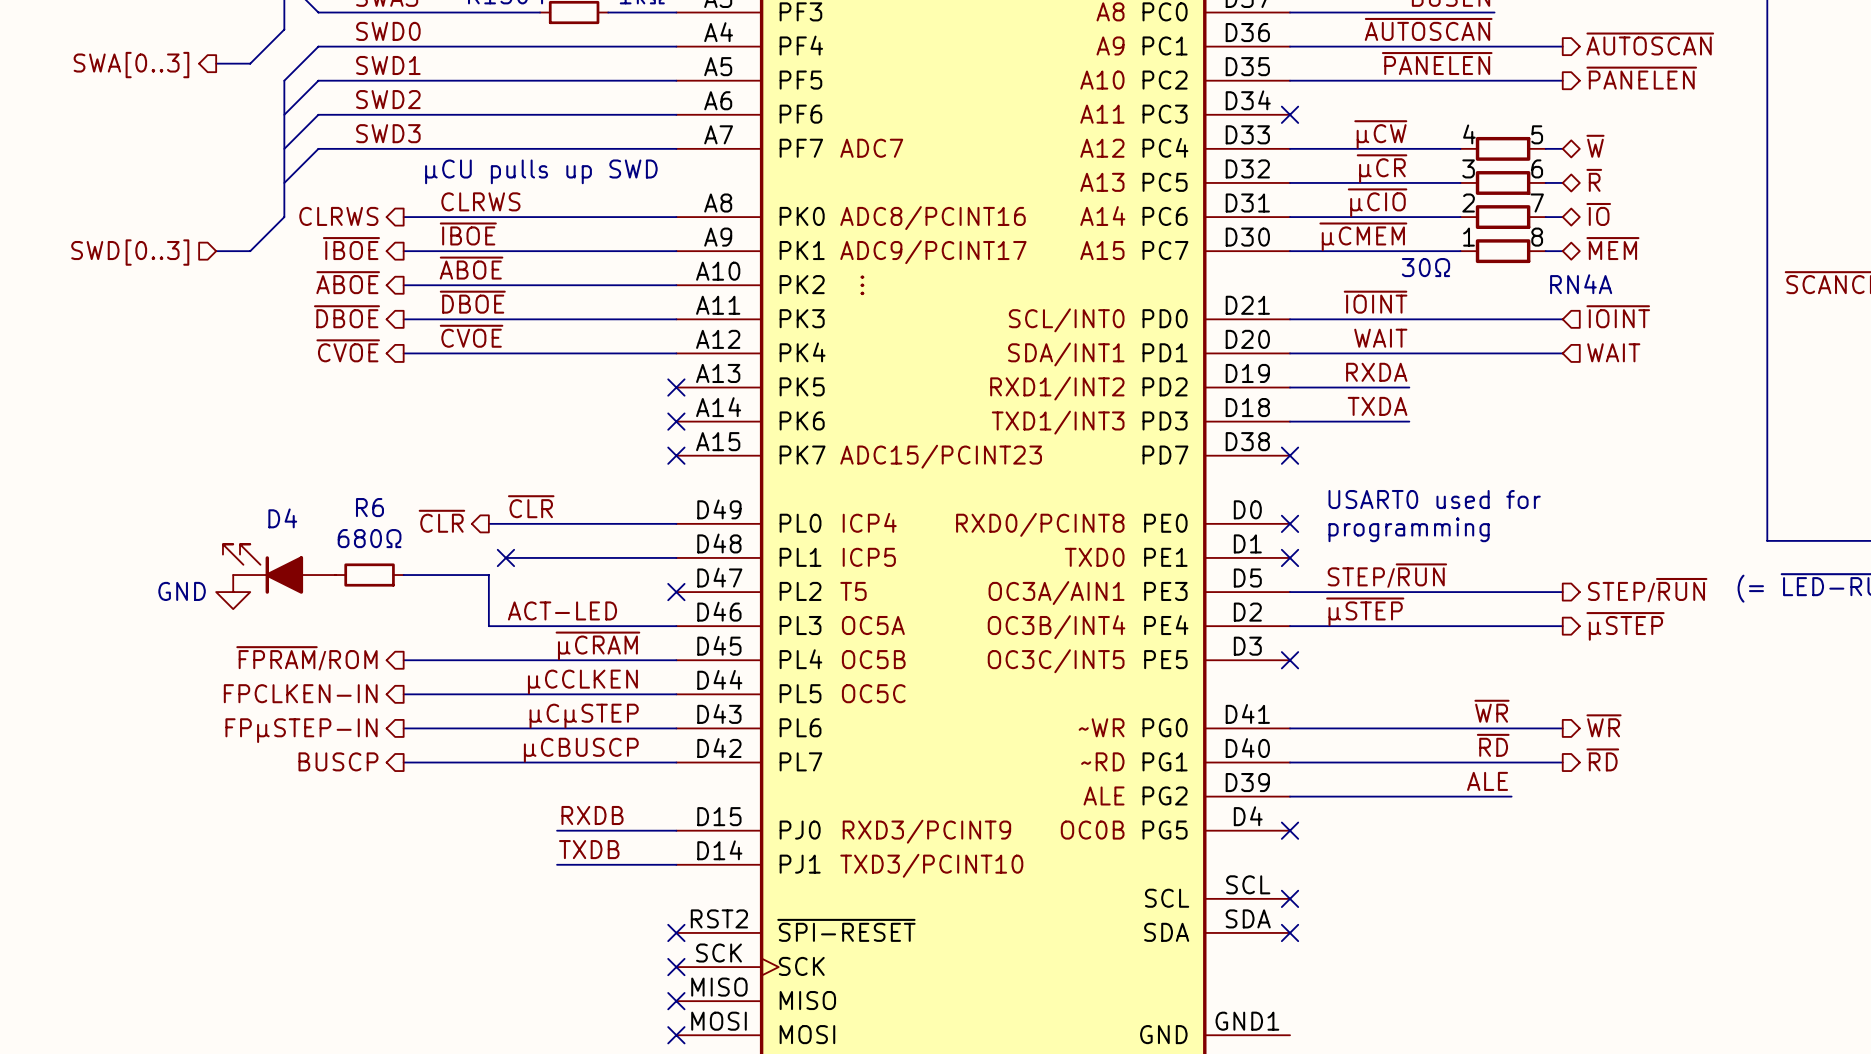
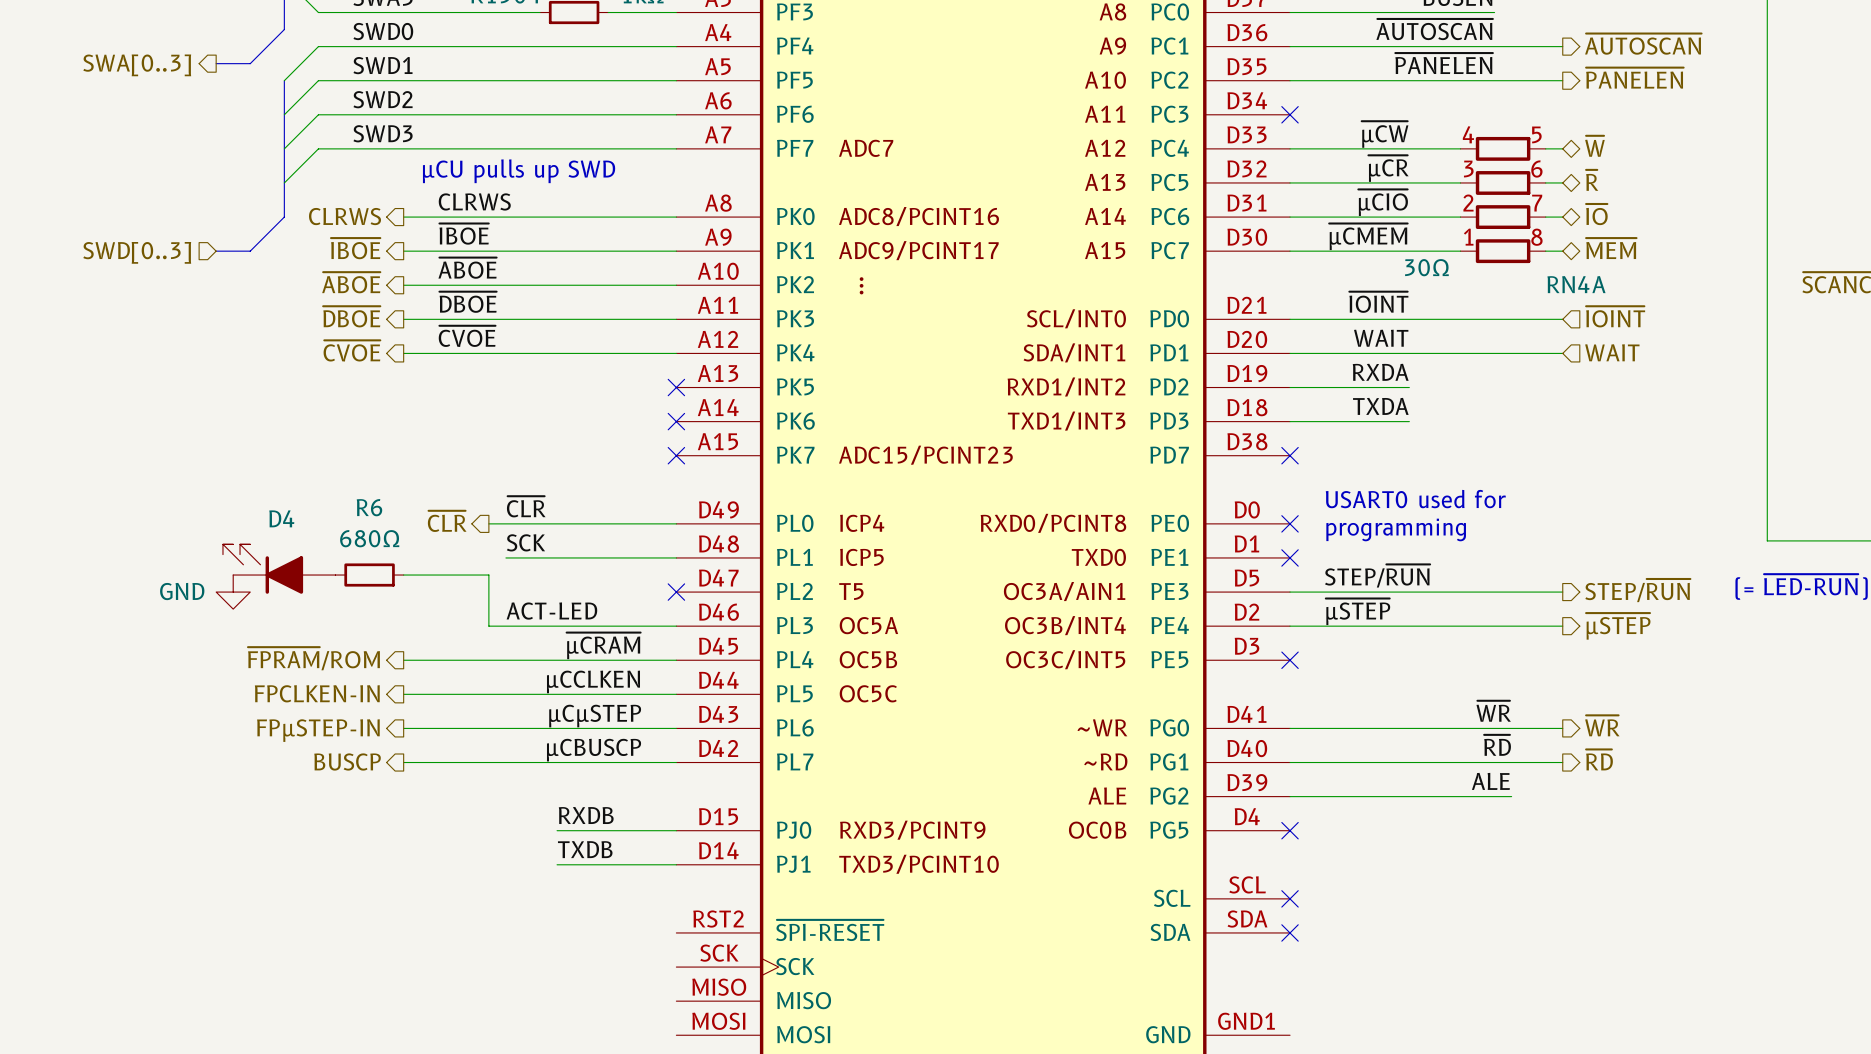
label: none -> SCK (525, 542)
no-connect mark: (505, 557) -> none
no-connect mark: (676, 932) -> none
no-connect mark: (676, 967) -> none
no-connect mark: (676, 1001) -> none
no-connect mark: (676, 1035) -> none

